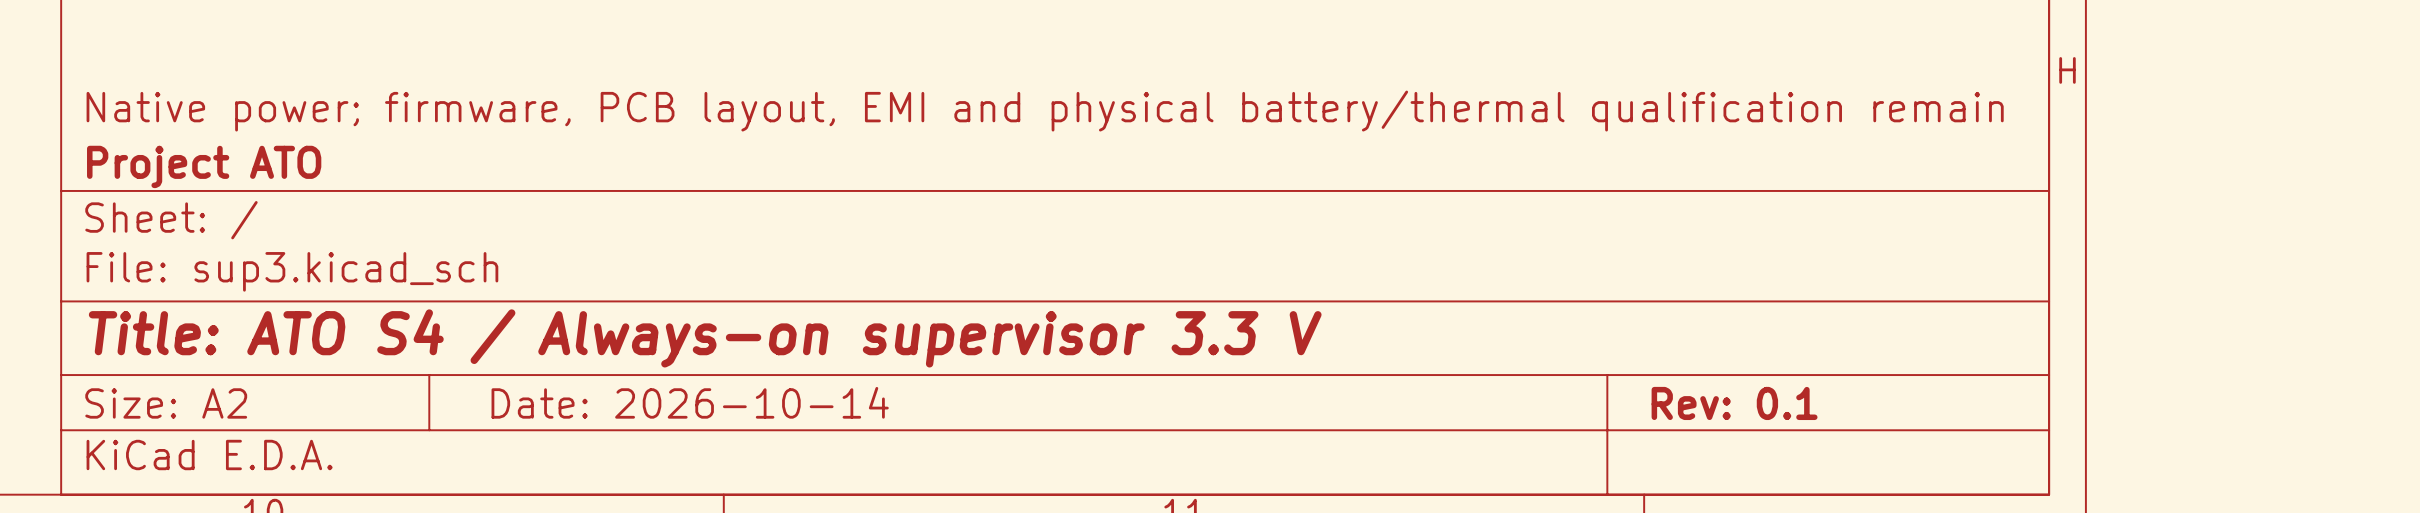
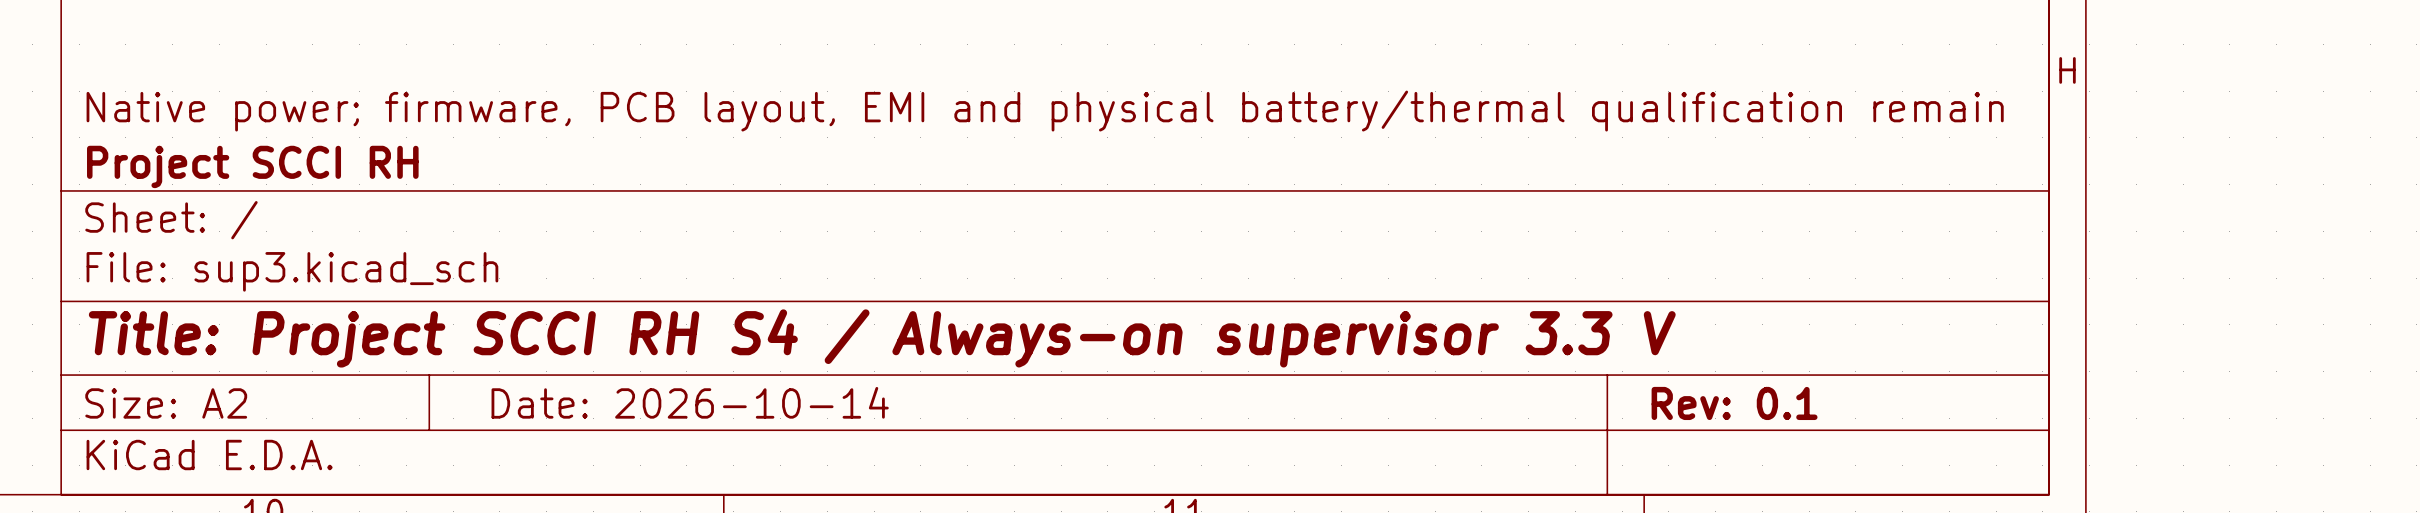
title block: Project ATO (204, 166) -> Project SCCI RH (252, 166)
title block: Title: ATO S4 / Always-on supervisor 3.3 V (705, 338) -> Title: Project SCCI RH S4 / Always-on supervisor 3.3 V (882, 338)

